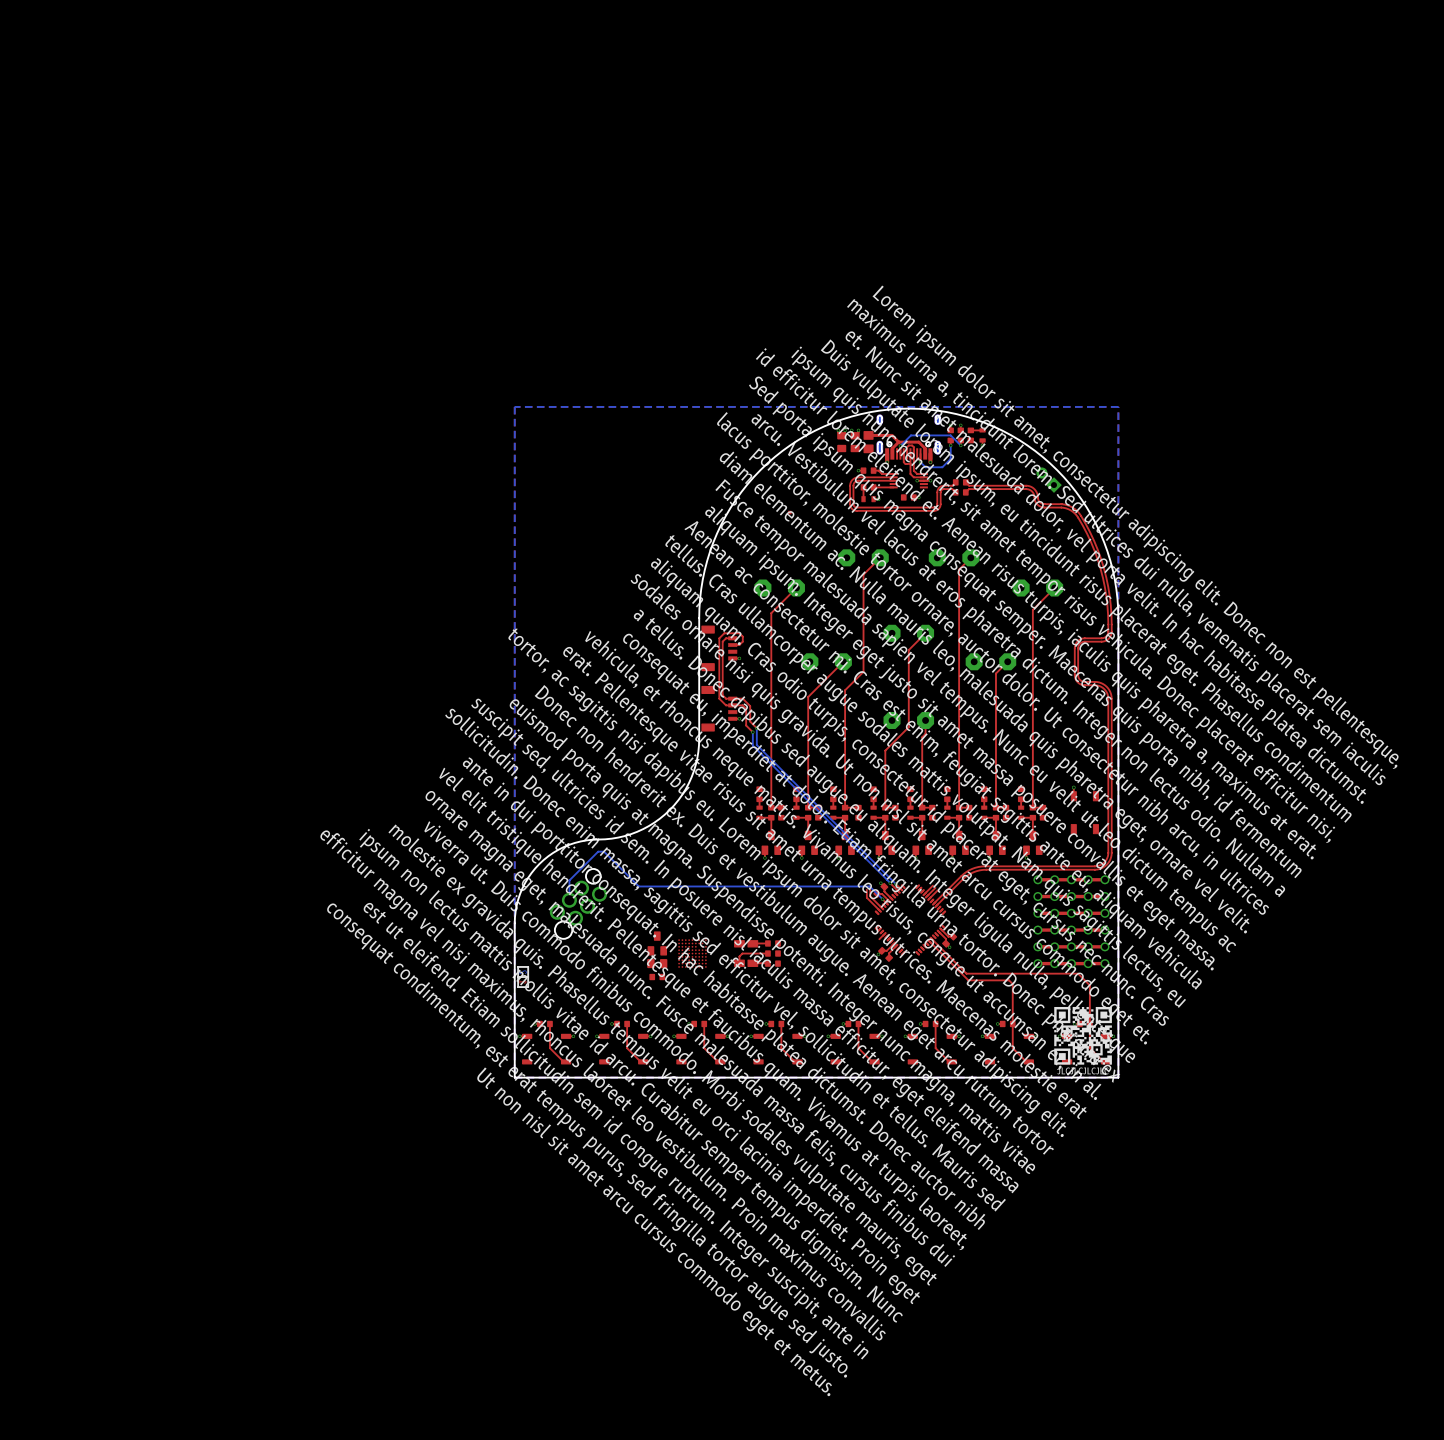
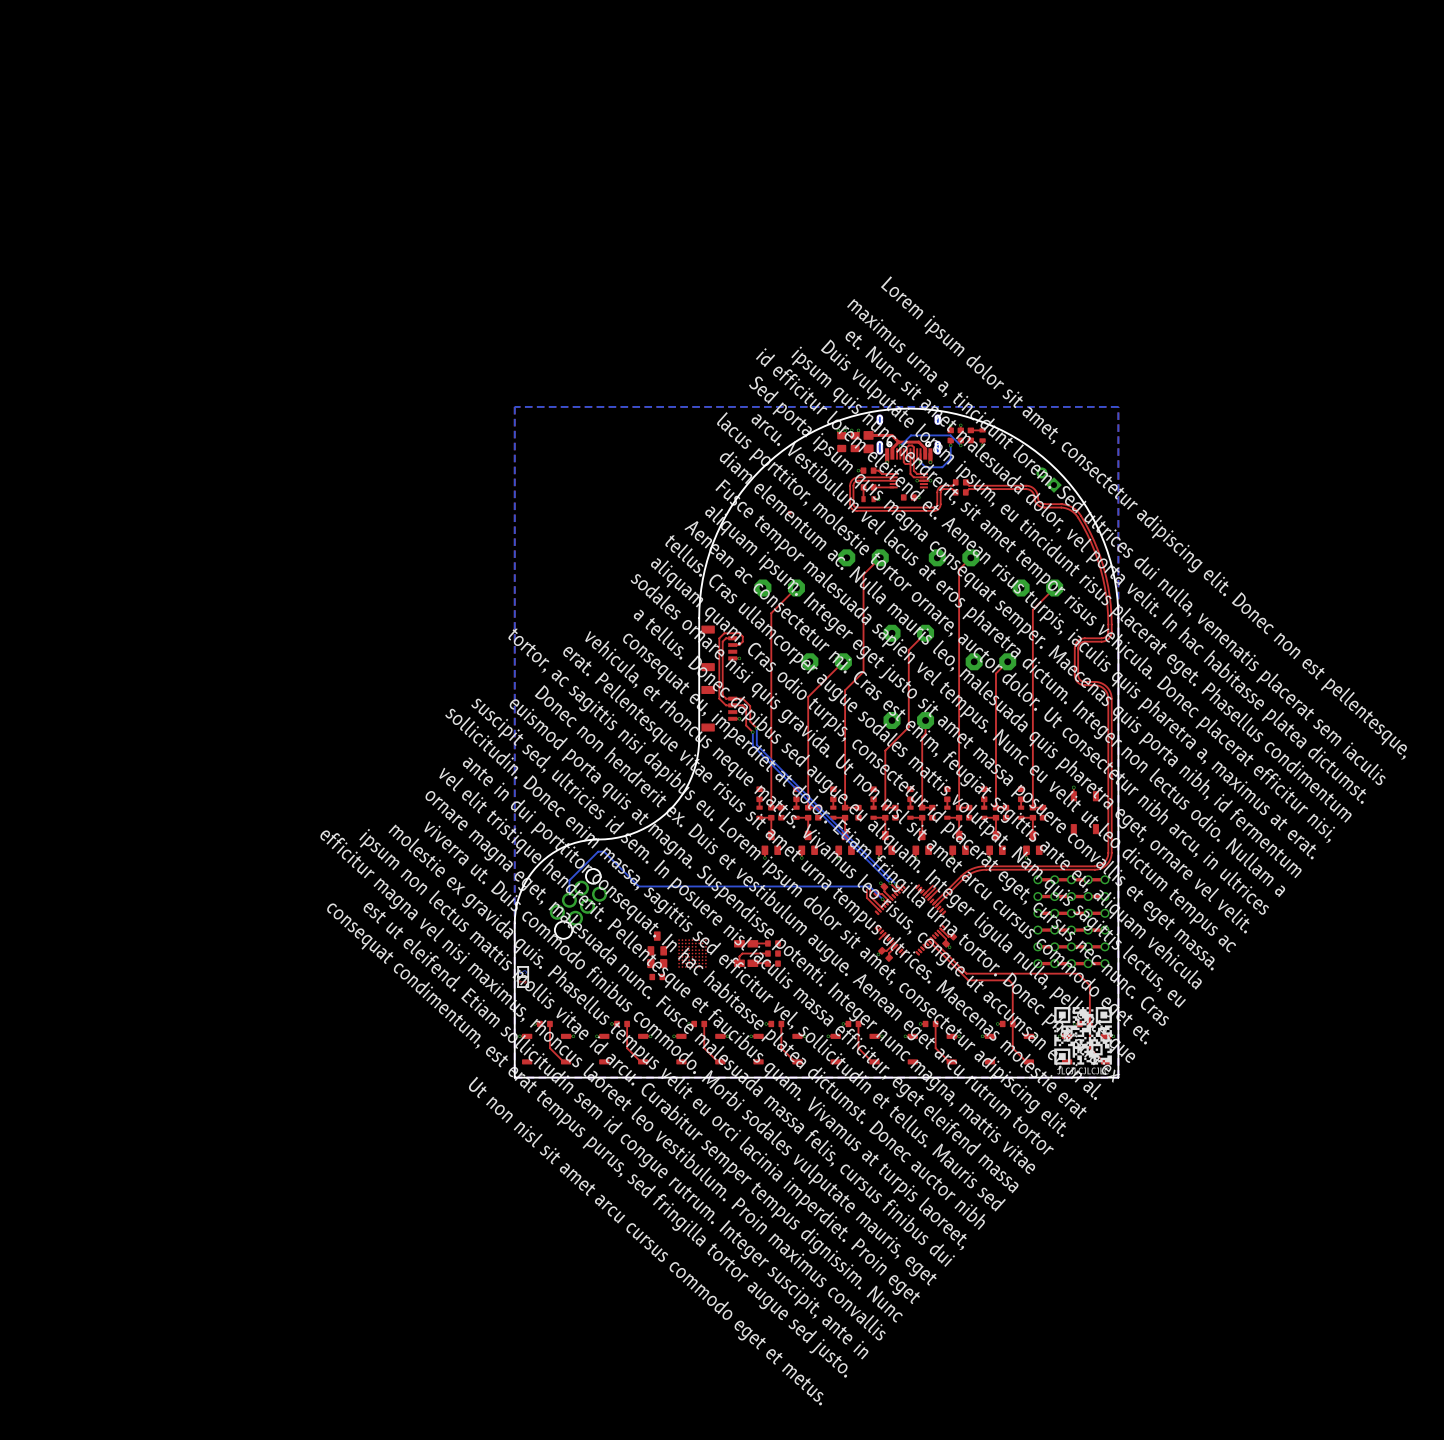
text position: Lorem ipsum dolor sit amet, consectetur adipiscing elit. Donec non est pellentesque, (1135, 527) -> Lorem ipsum dolor sit amet, consectetur adipiscing elit. Donec non est pellentesque, (1143, 517)
text position: Ut non nisl sit amet arcu cursus commodo eget et metus. (654, 1231) -> Ut non nisl sit amet arcu cursus commodo eget et metus. (646, 1241)

